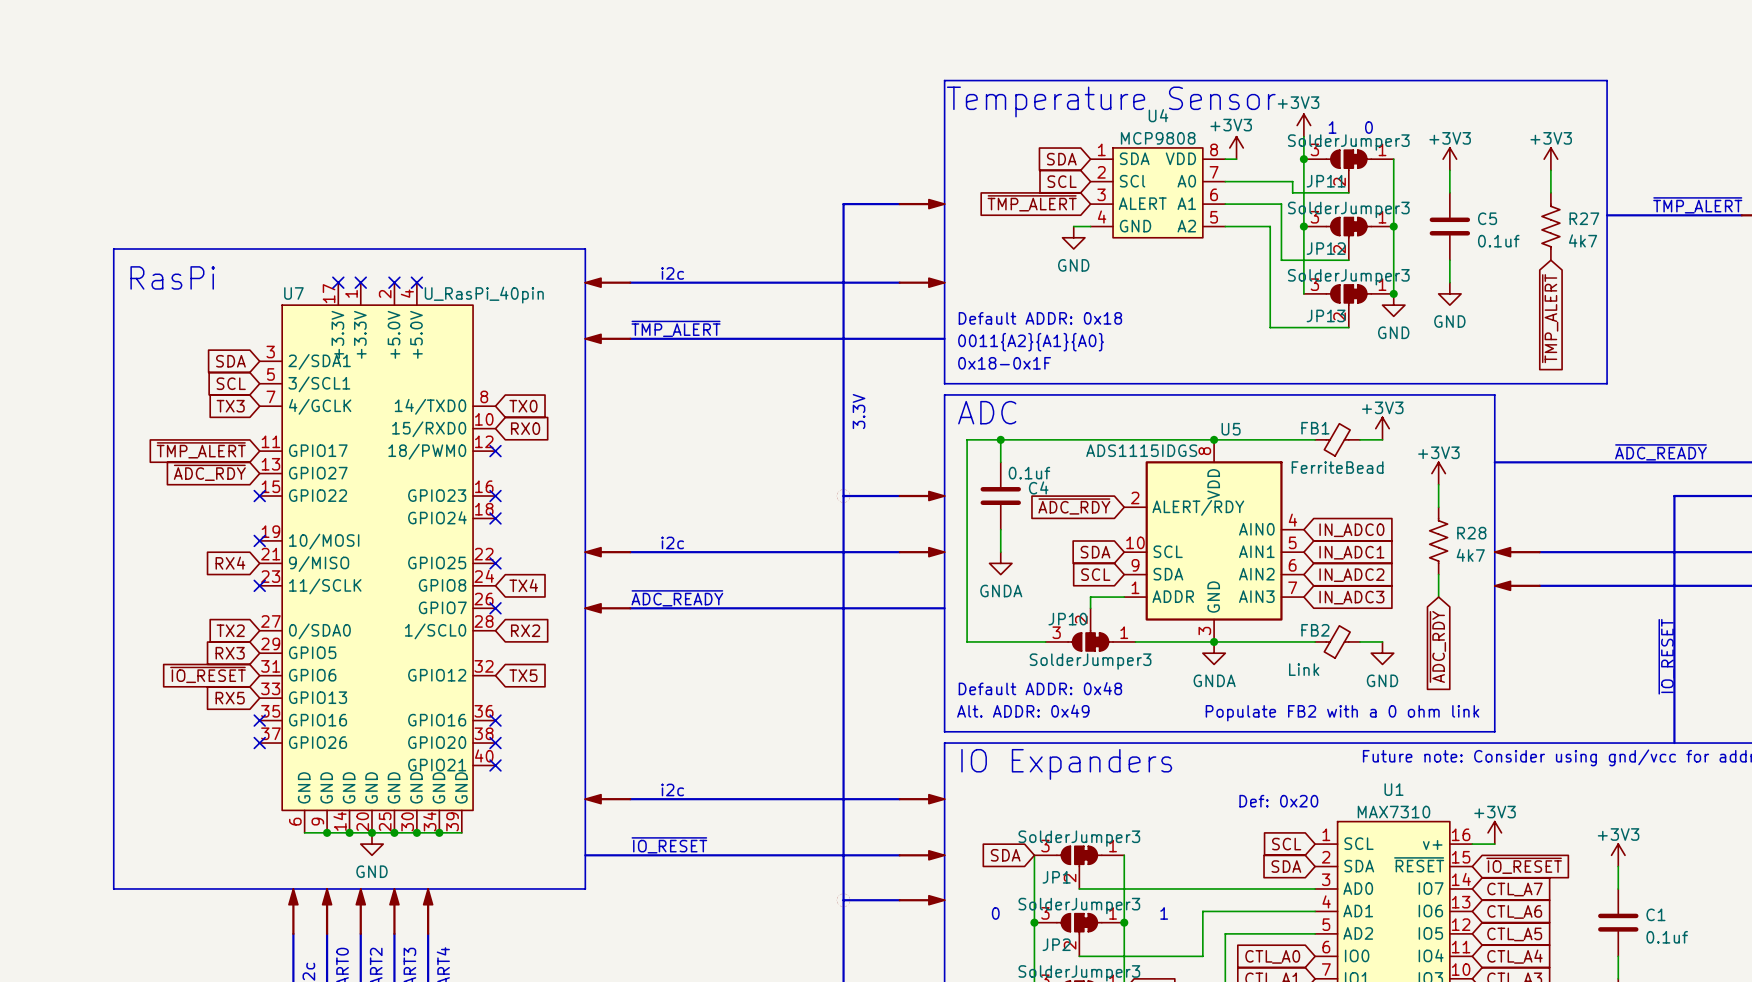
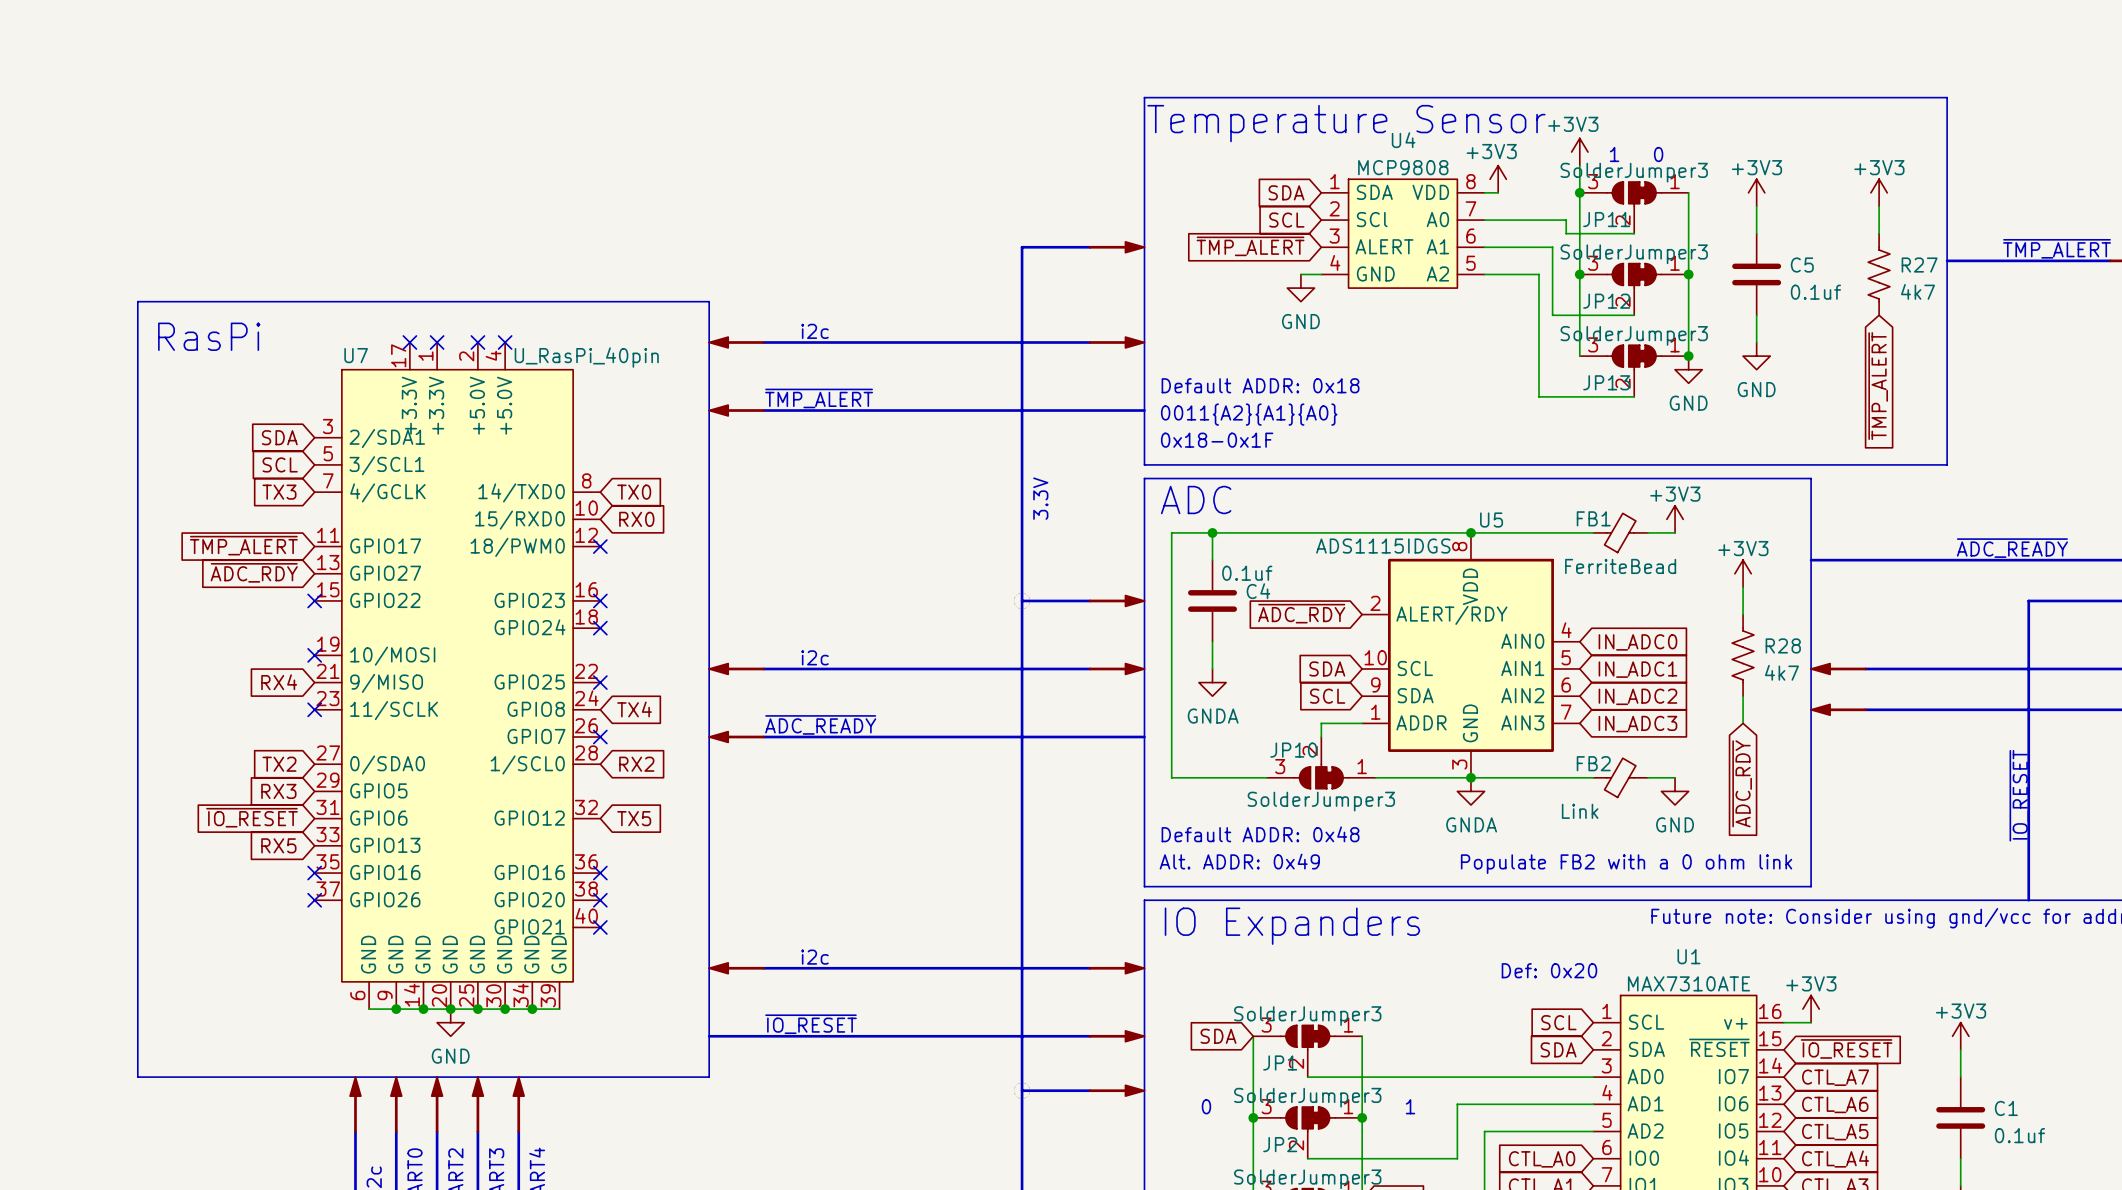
U1 value: MAX7310 (1393, 812) -> MAX7310ATE (1688, 983)

